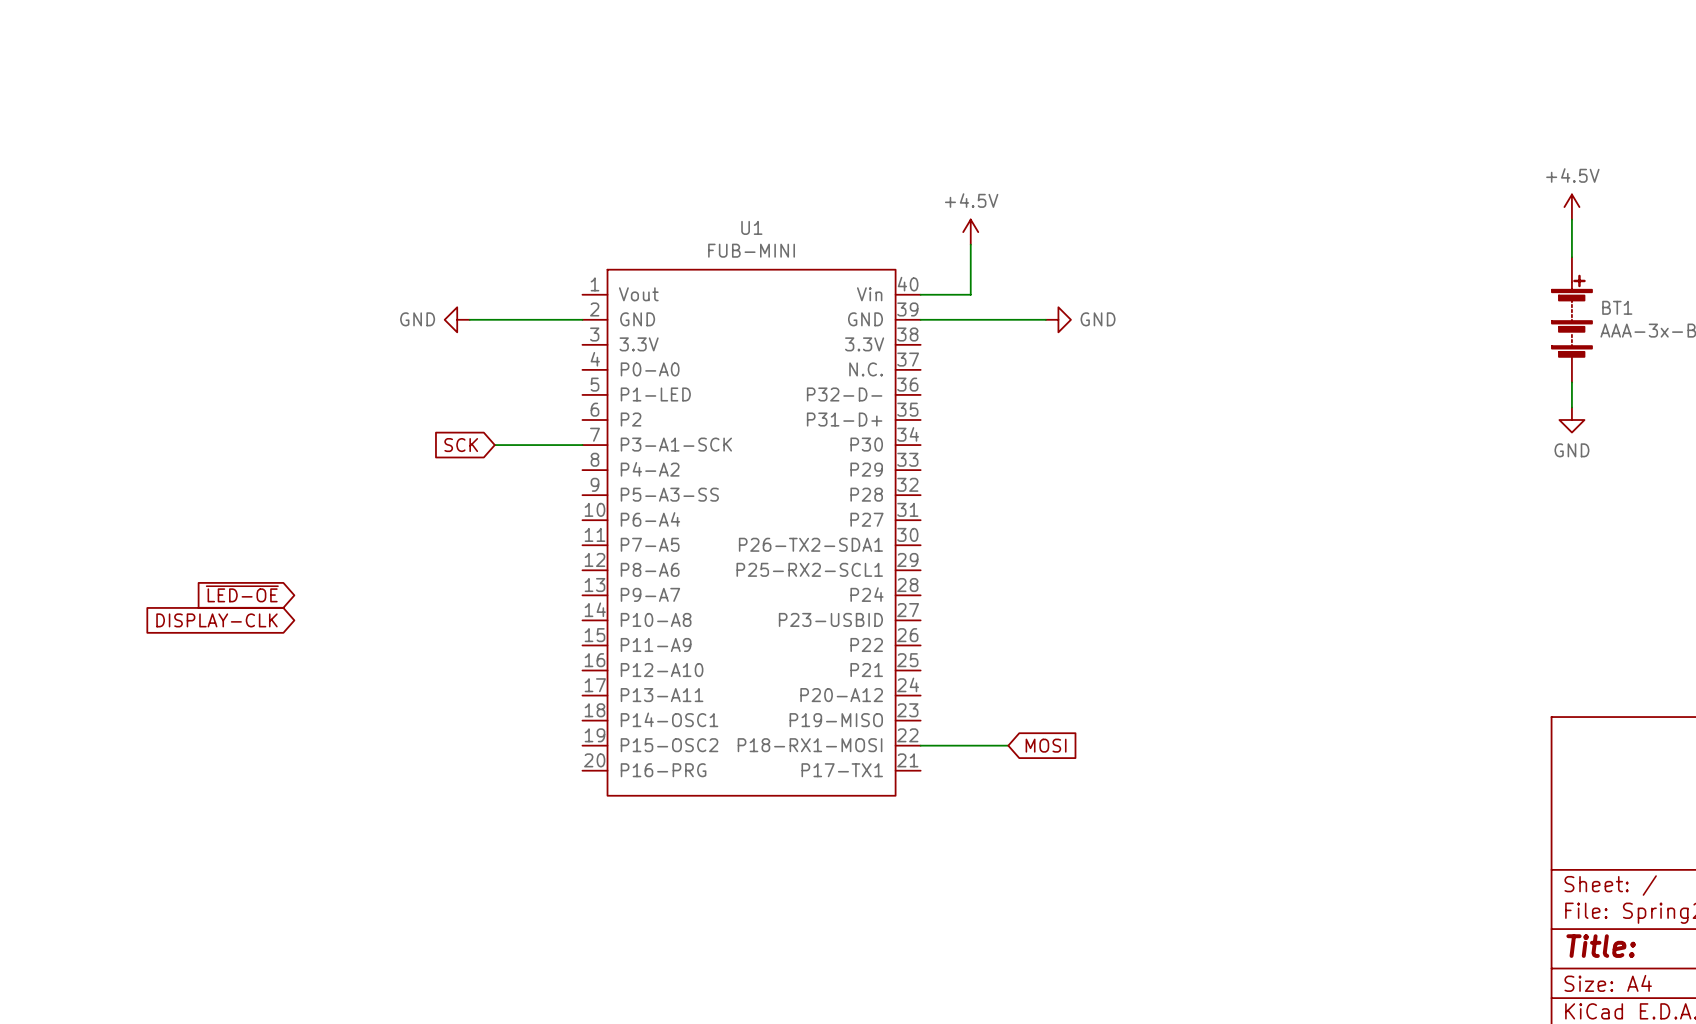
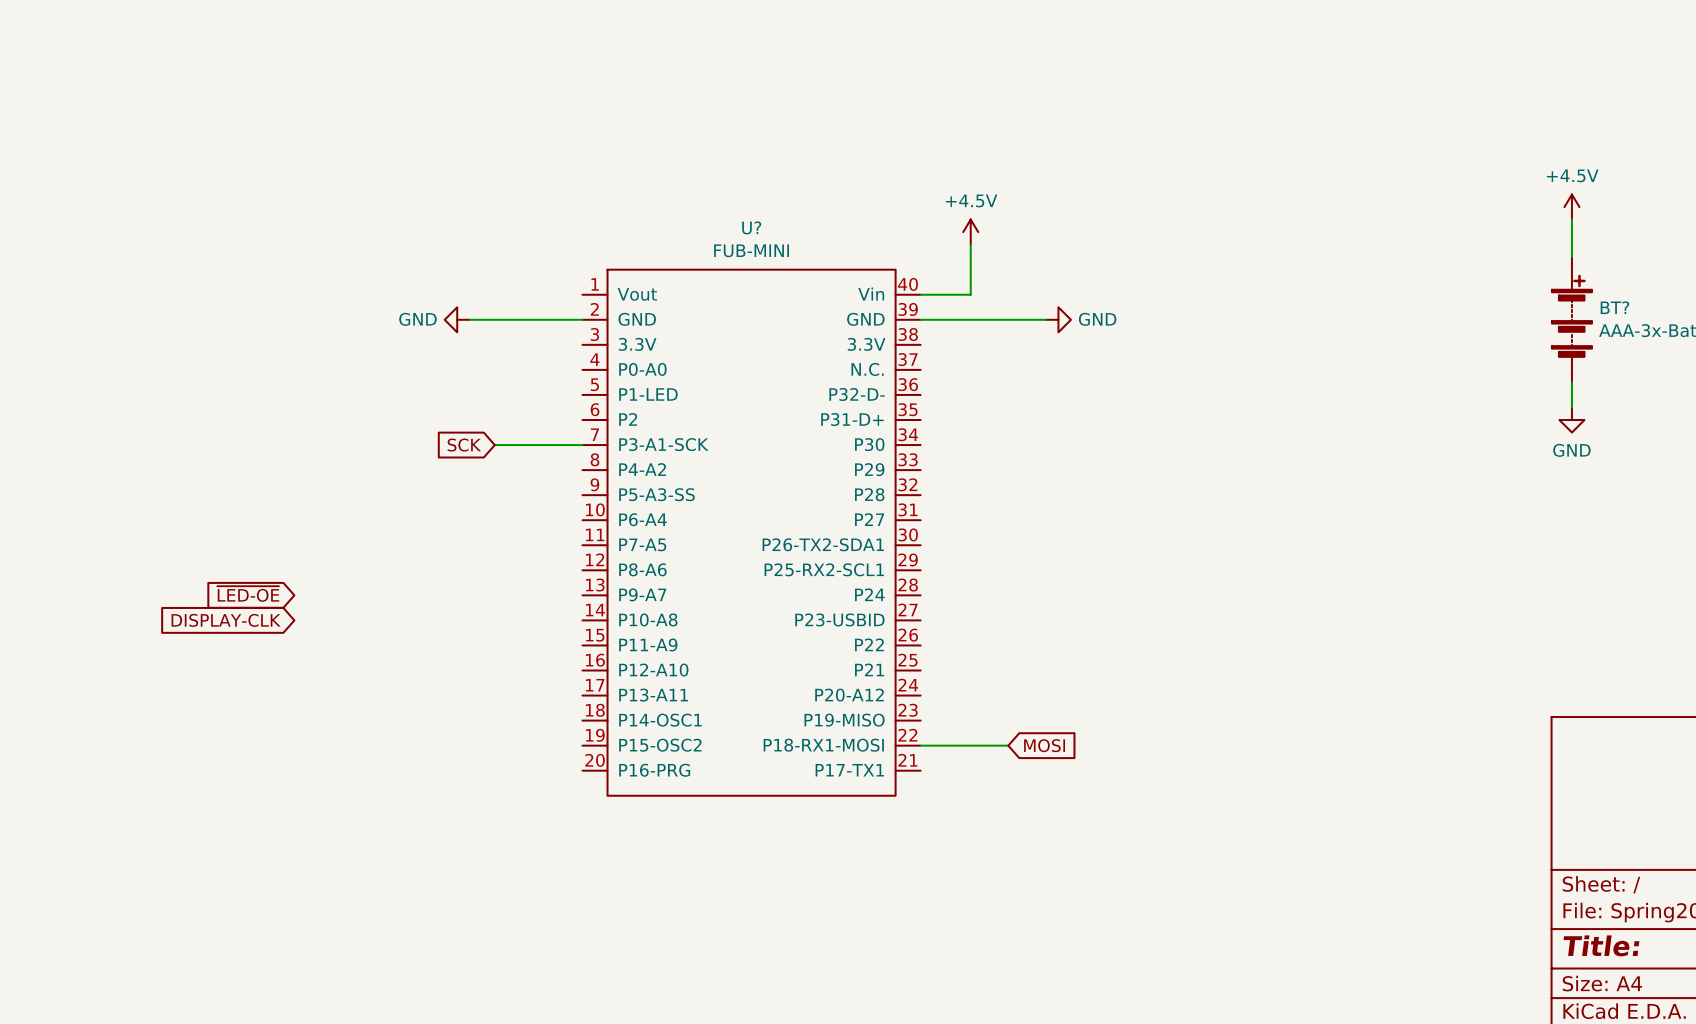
U1 name: U1 (751, 227) -> U? (751, 227)
BT1 name: BT1 (1617, 307) -> BT? (1614, 307)

